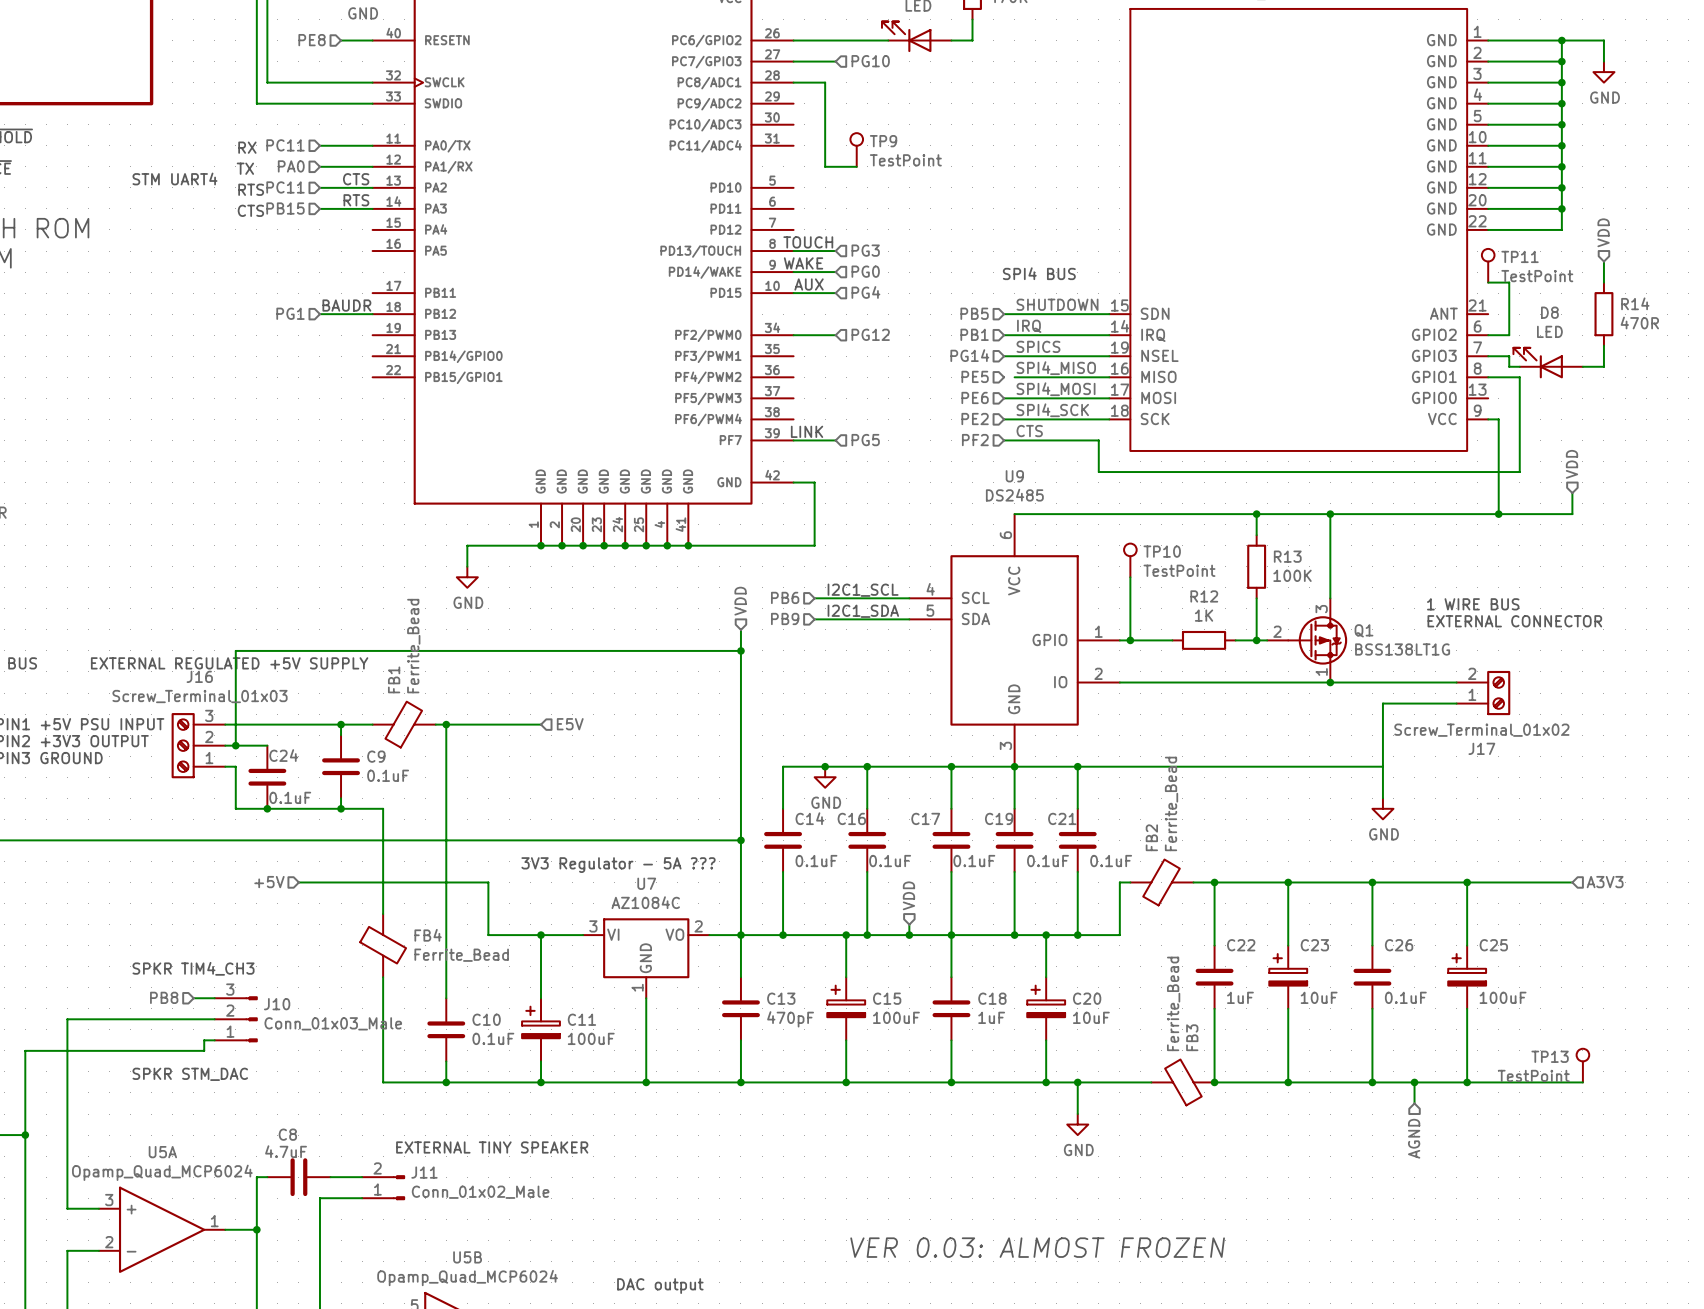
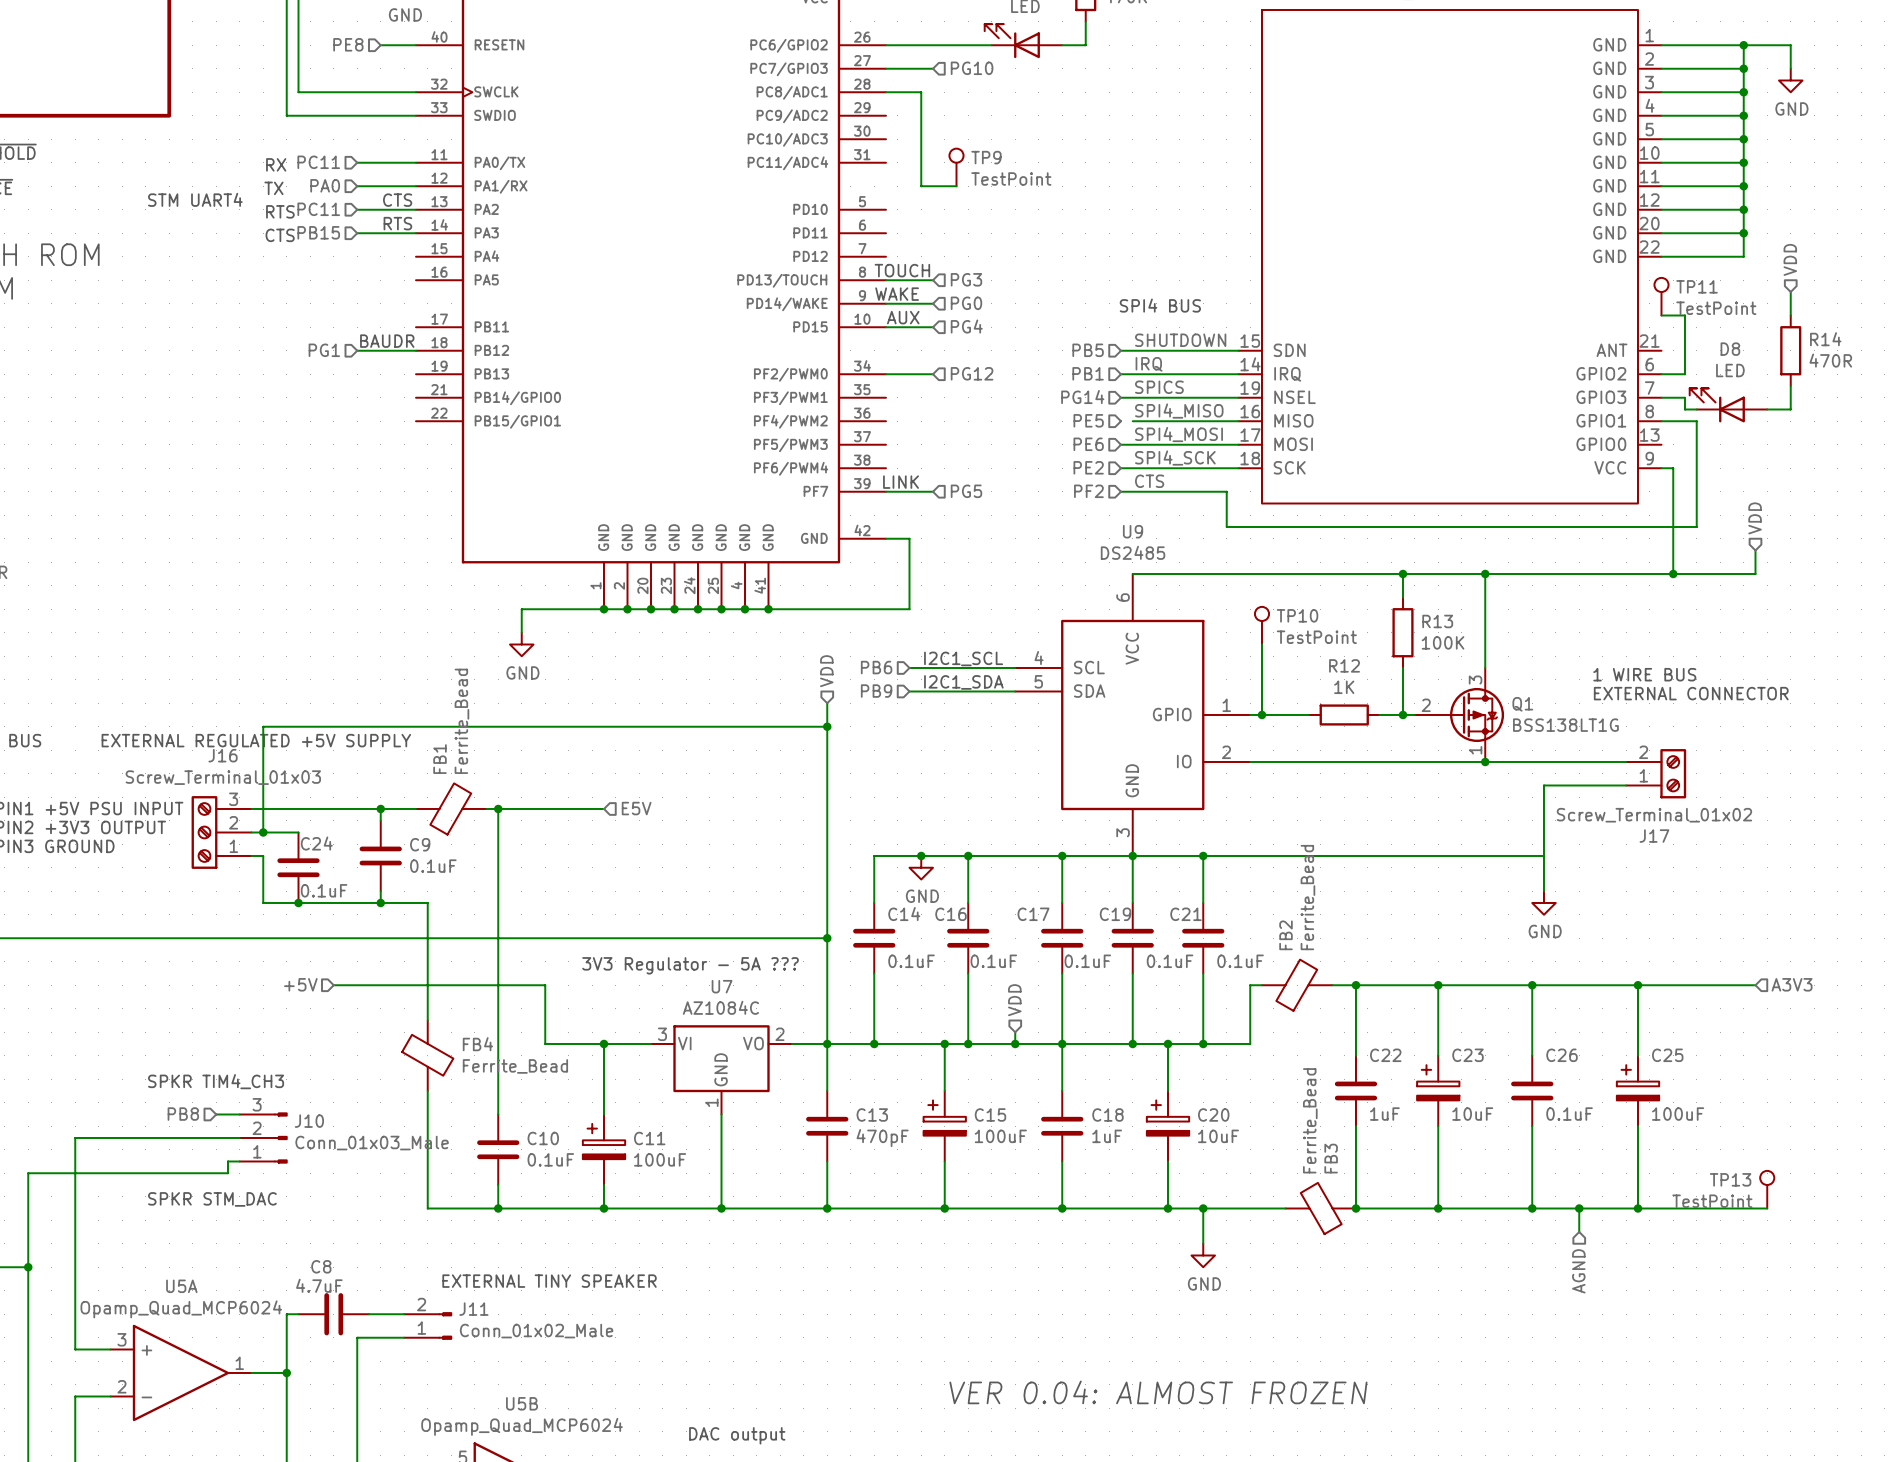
text: VER 0.03: ALMOST FROZEN (1037, 1247) -> VER 0.04: ALMOST FROZEN (1158, 1392)

